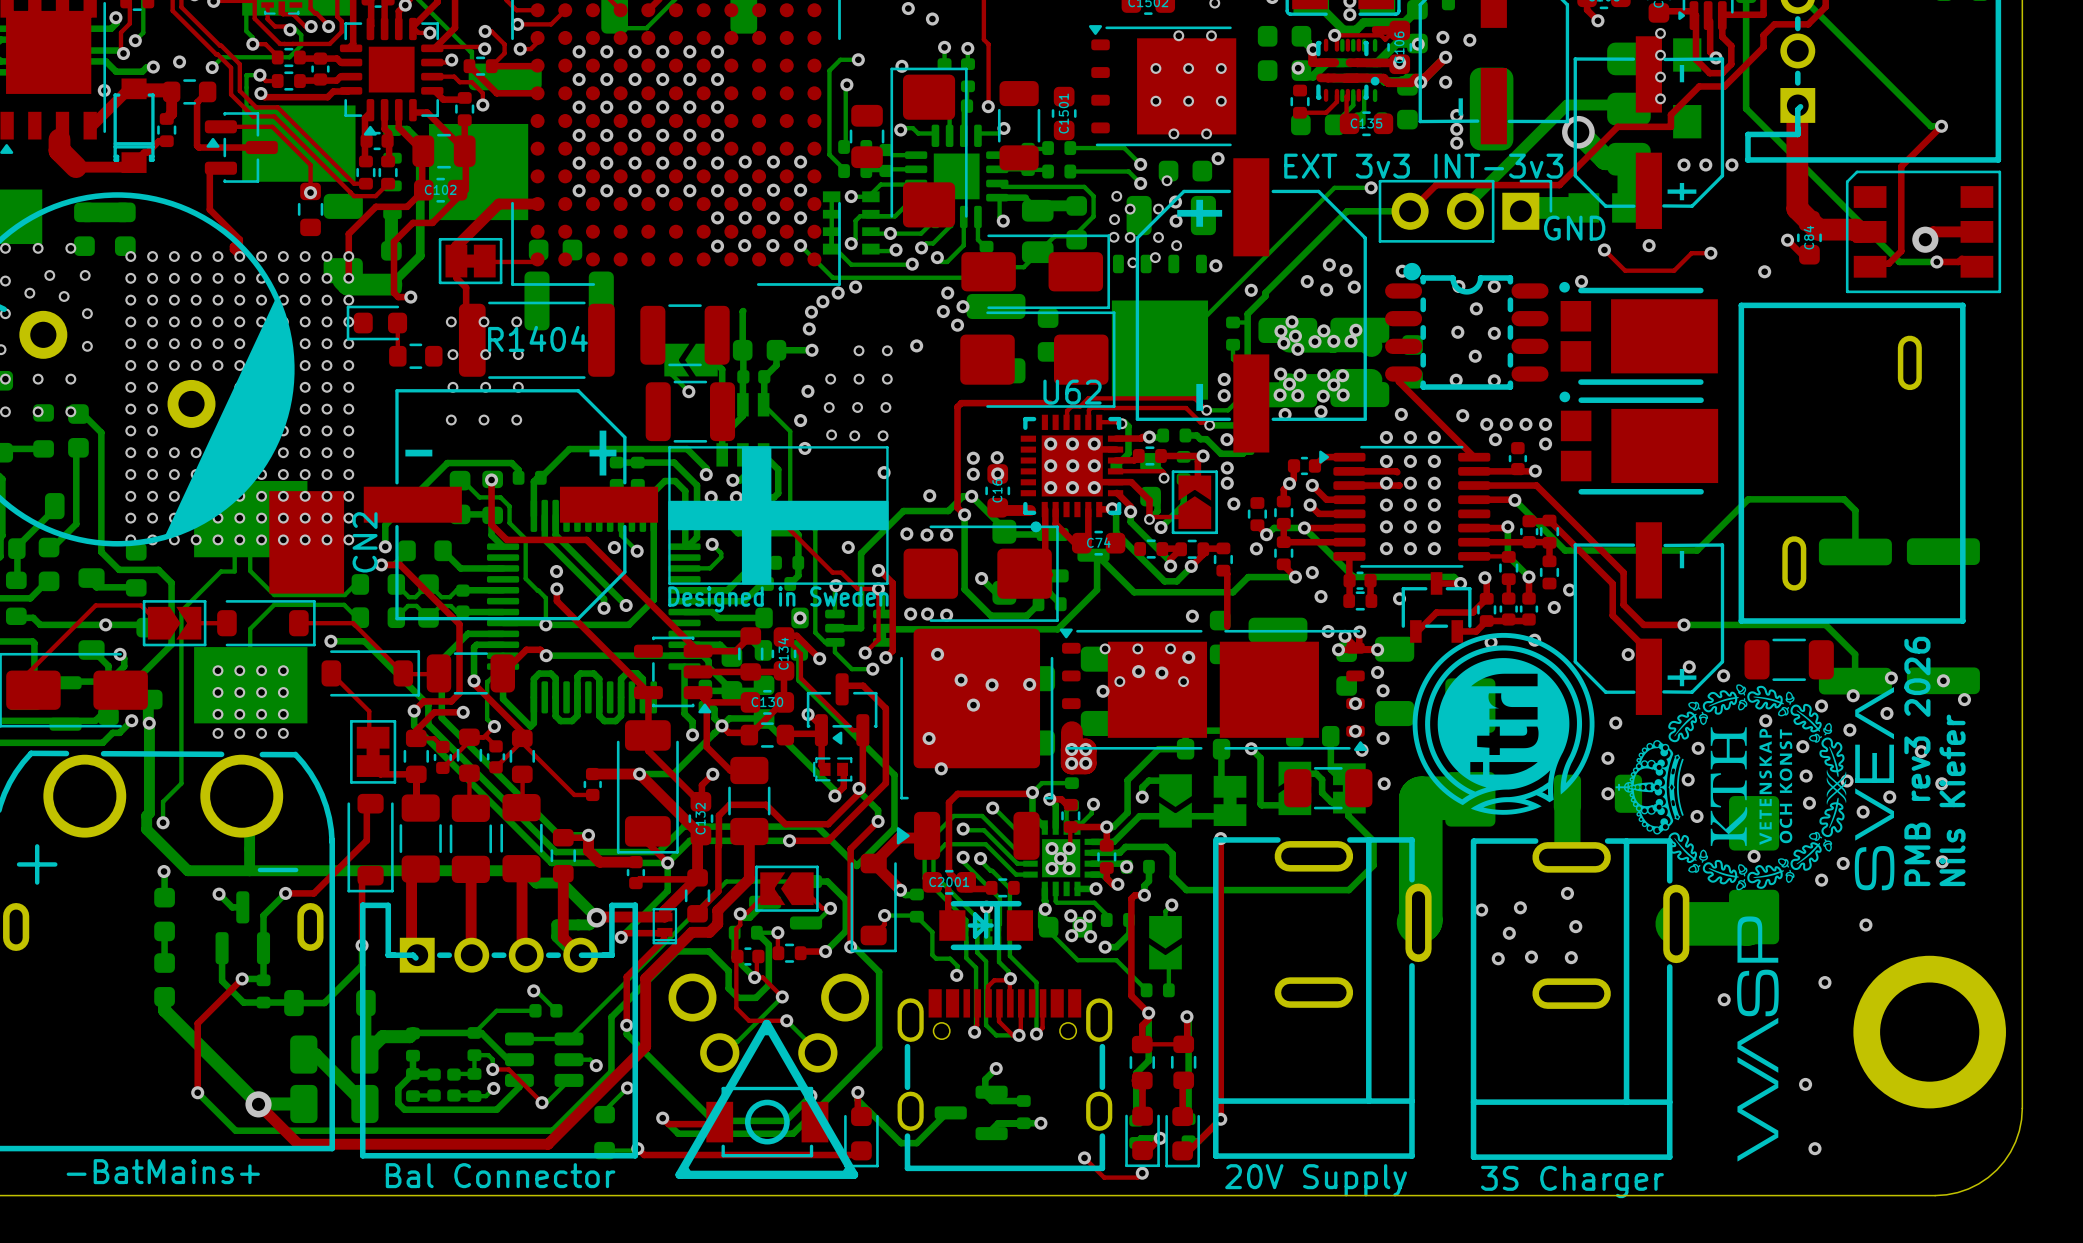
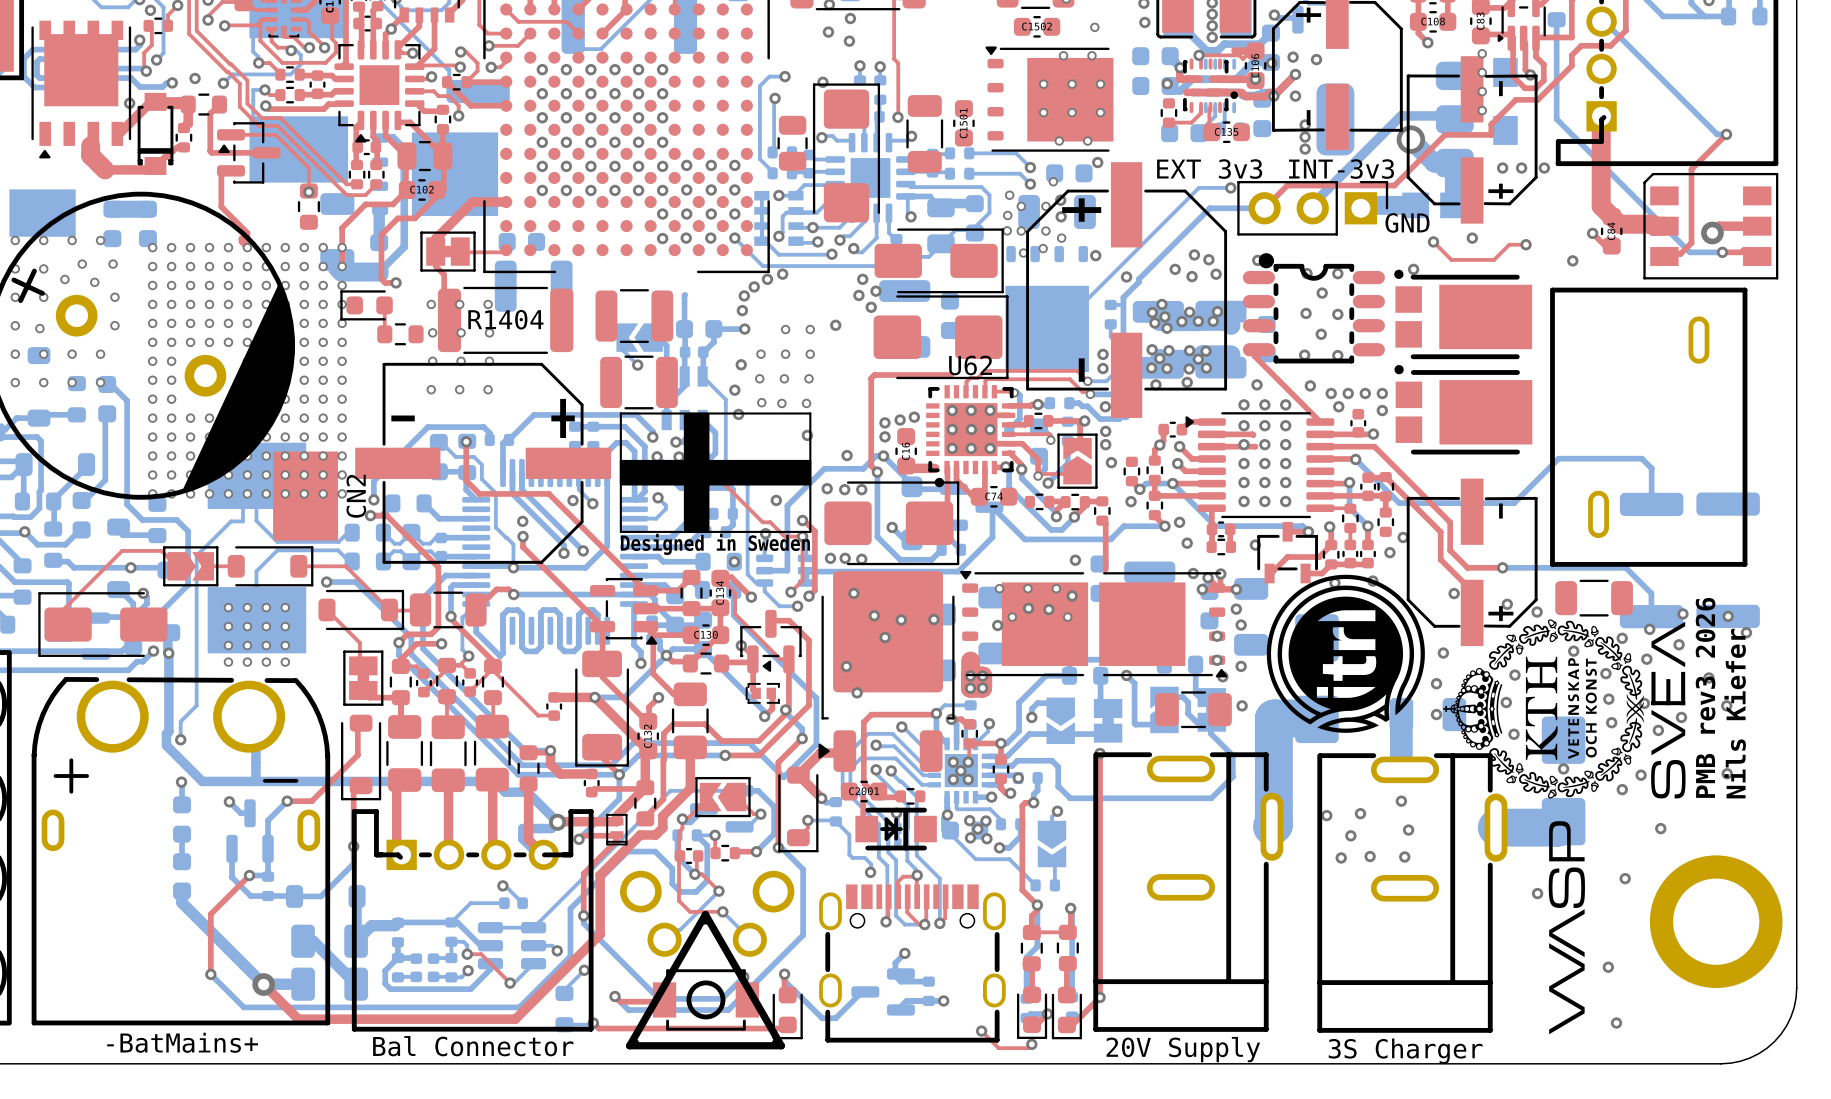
via: none -> (914, 417)
via: none -> (900, 420)
via: (997, 457) -> none
via: (997, 473) -> none

